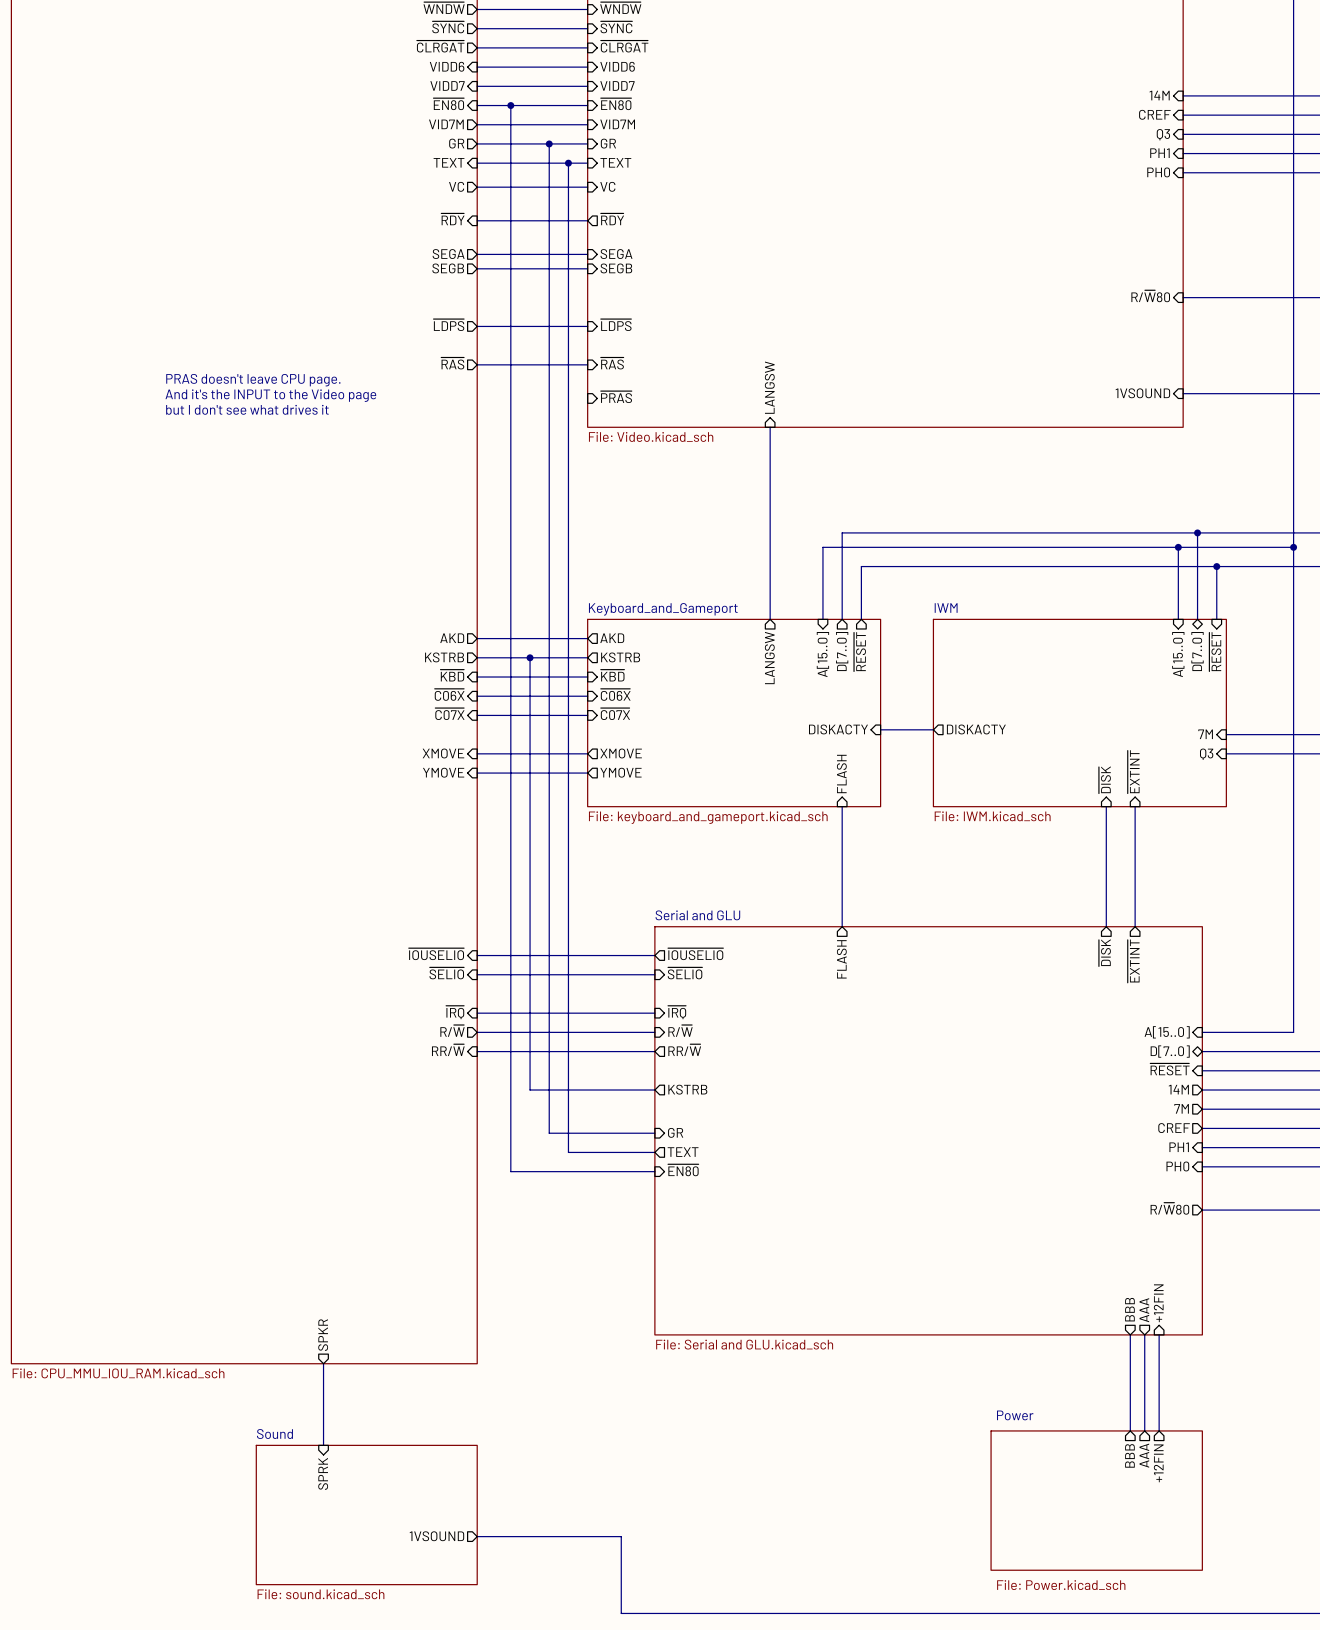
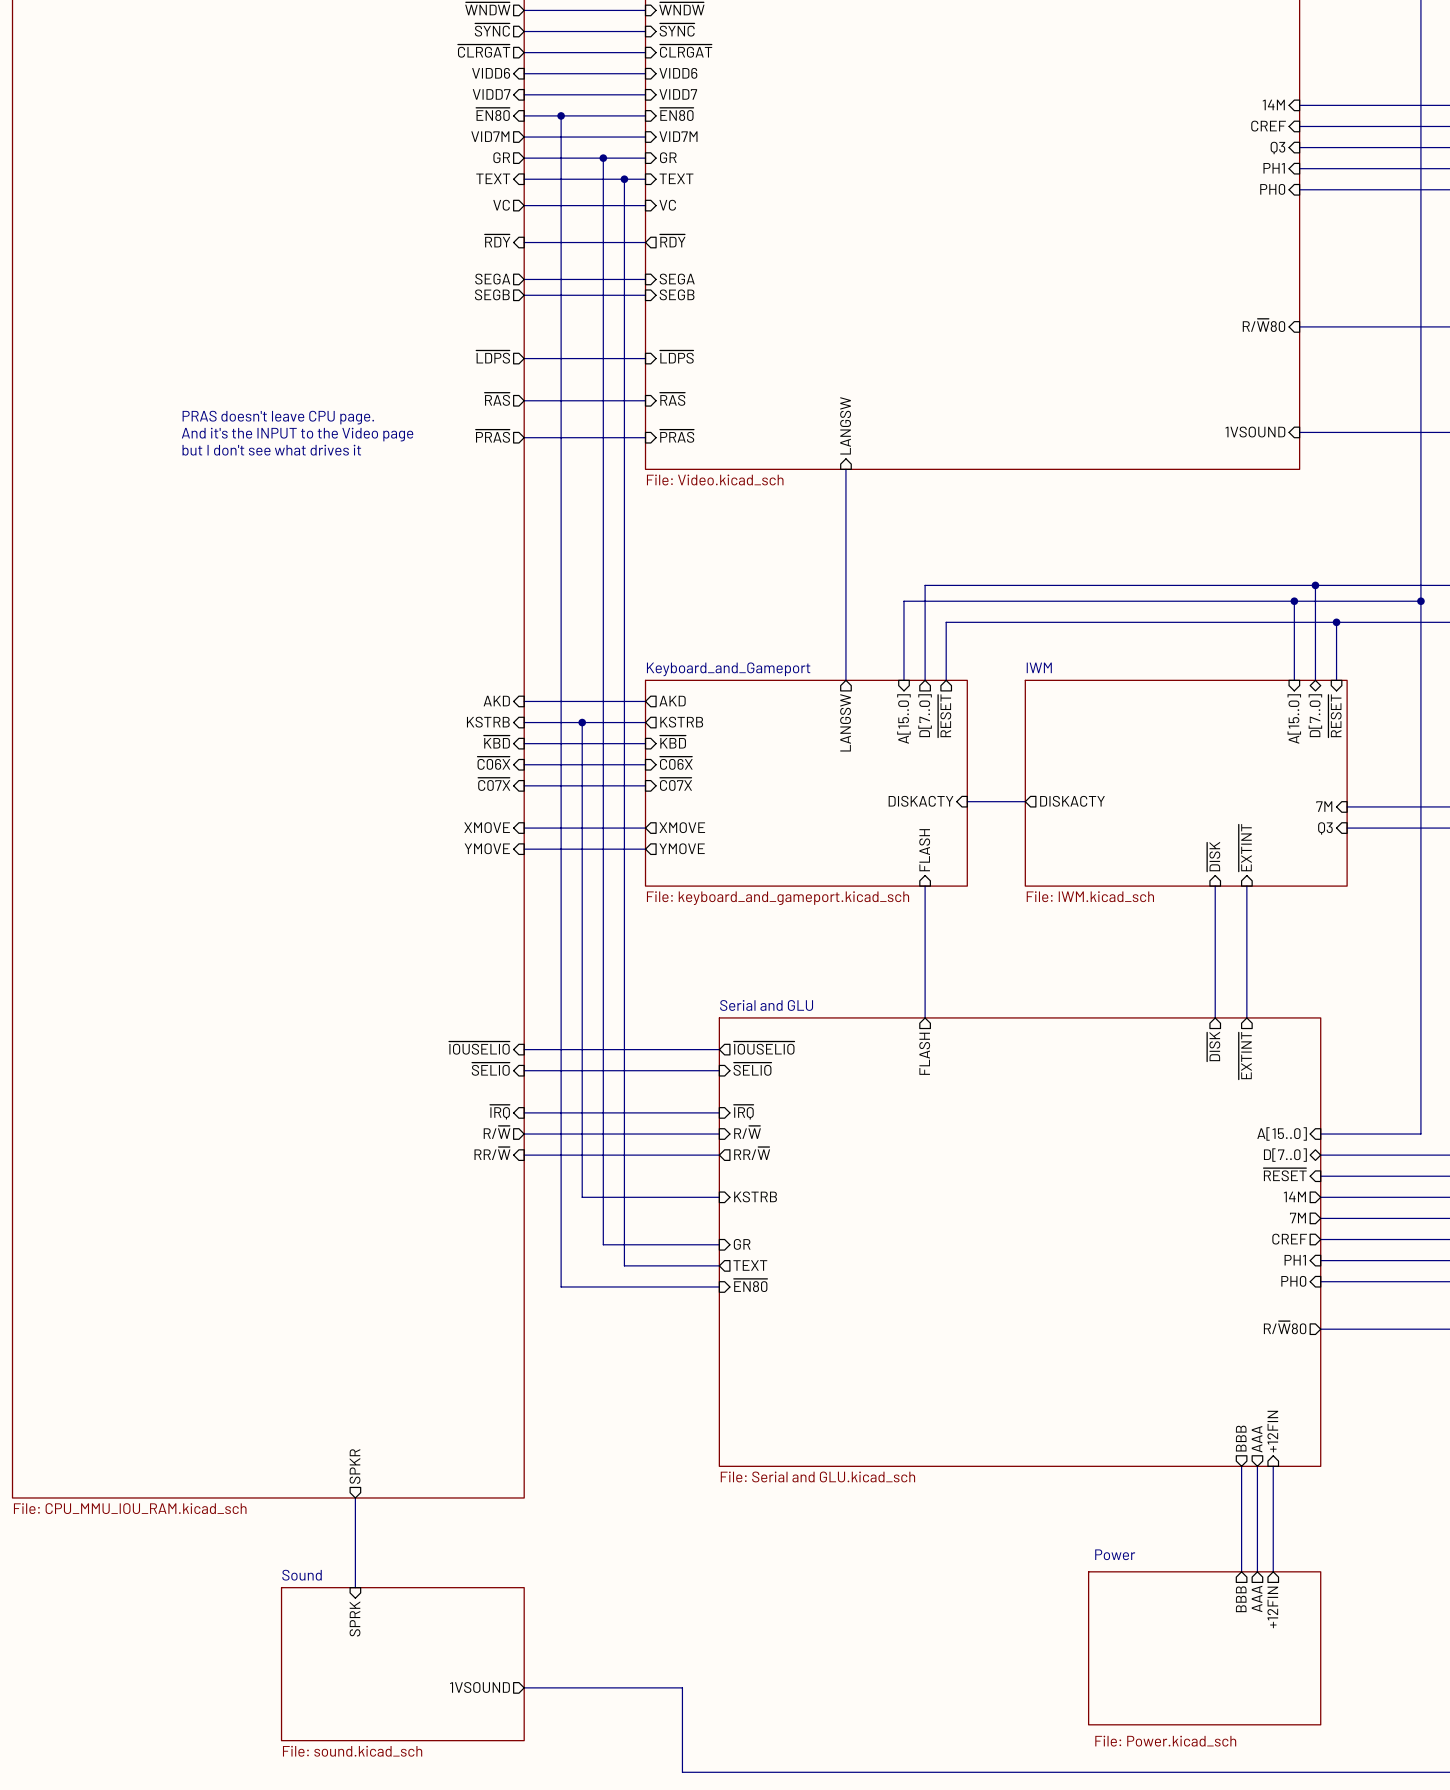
sheet pin: none -> ~{PRAS} (492, 436)
wire: none -> (524, 437) (645, 437)
sheet pin shape: output (452, 638) -> input (496, 701)
sheet pin shape: output (444, 657) -> input (488, 722)
sheet pin shape: output (687, 1089) -> input (755, 1196)

